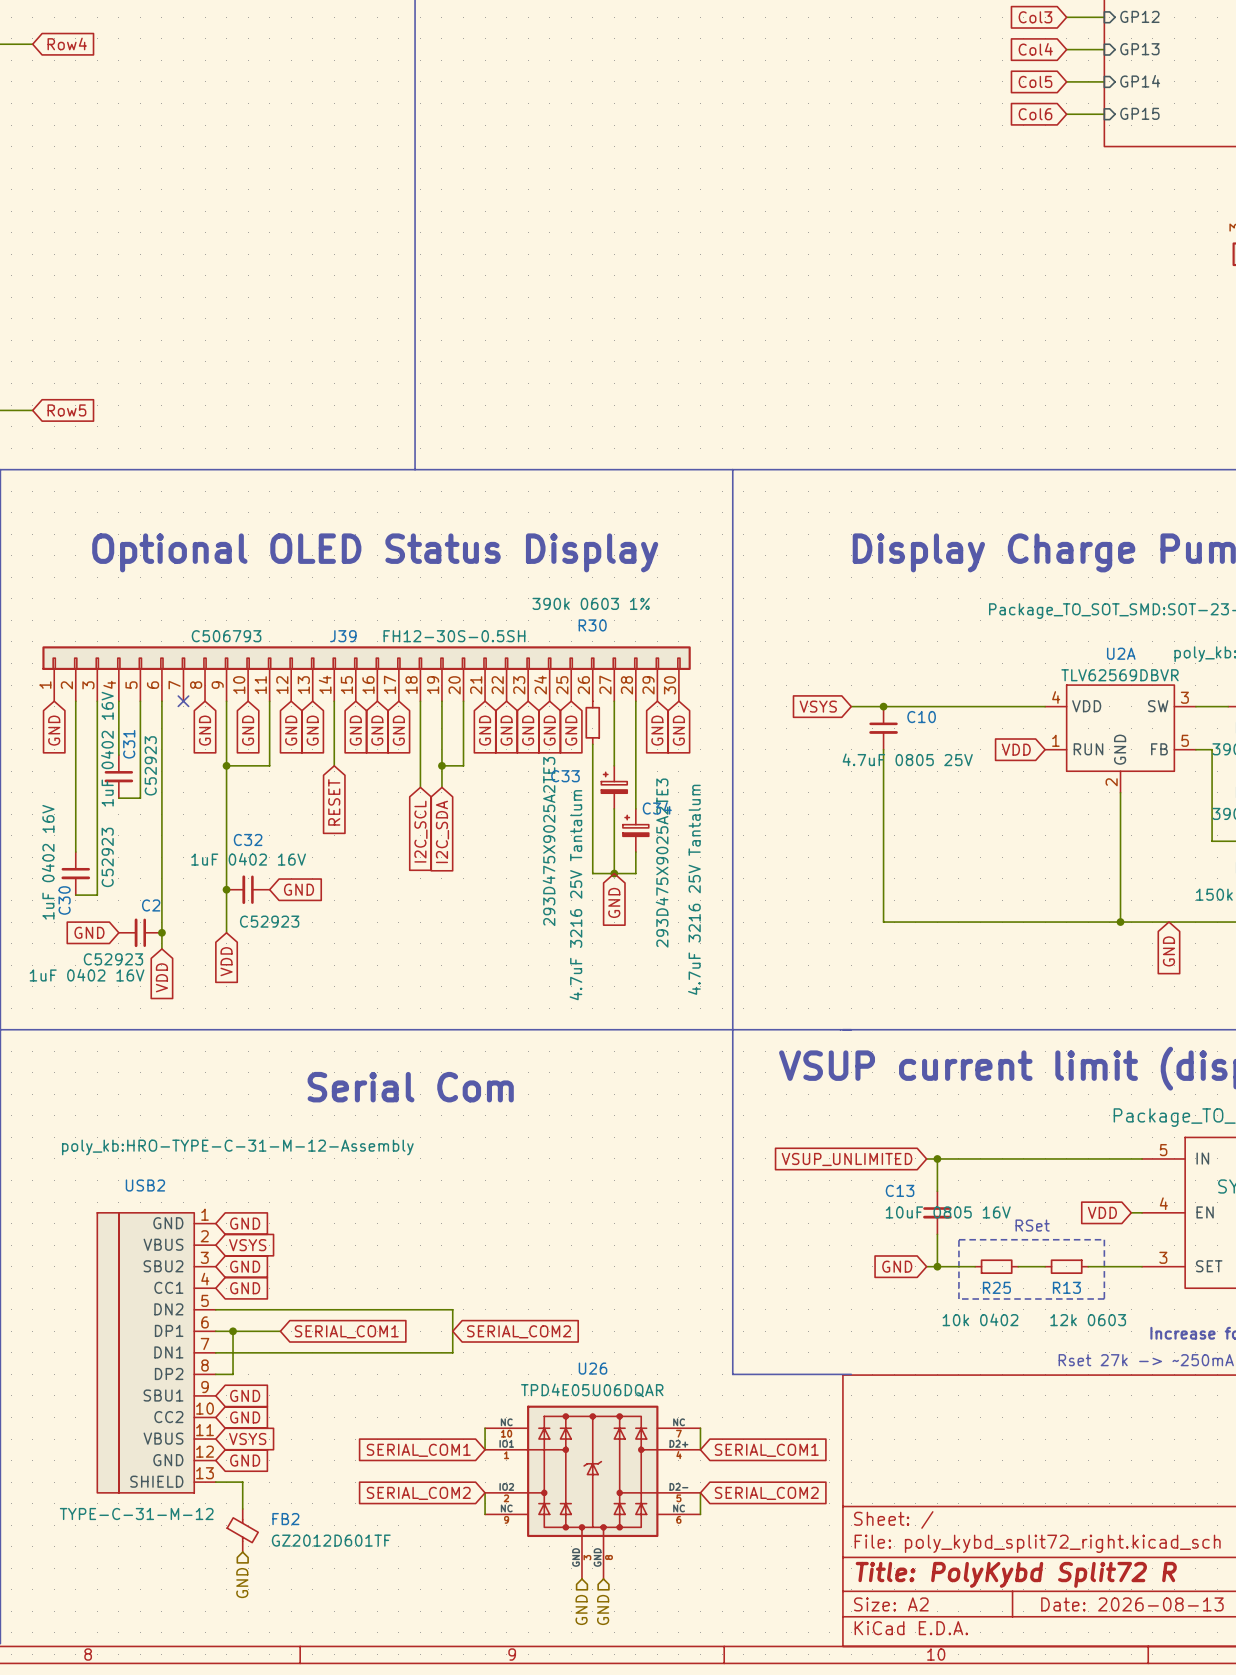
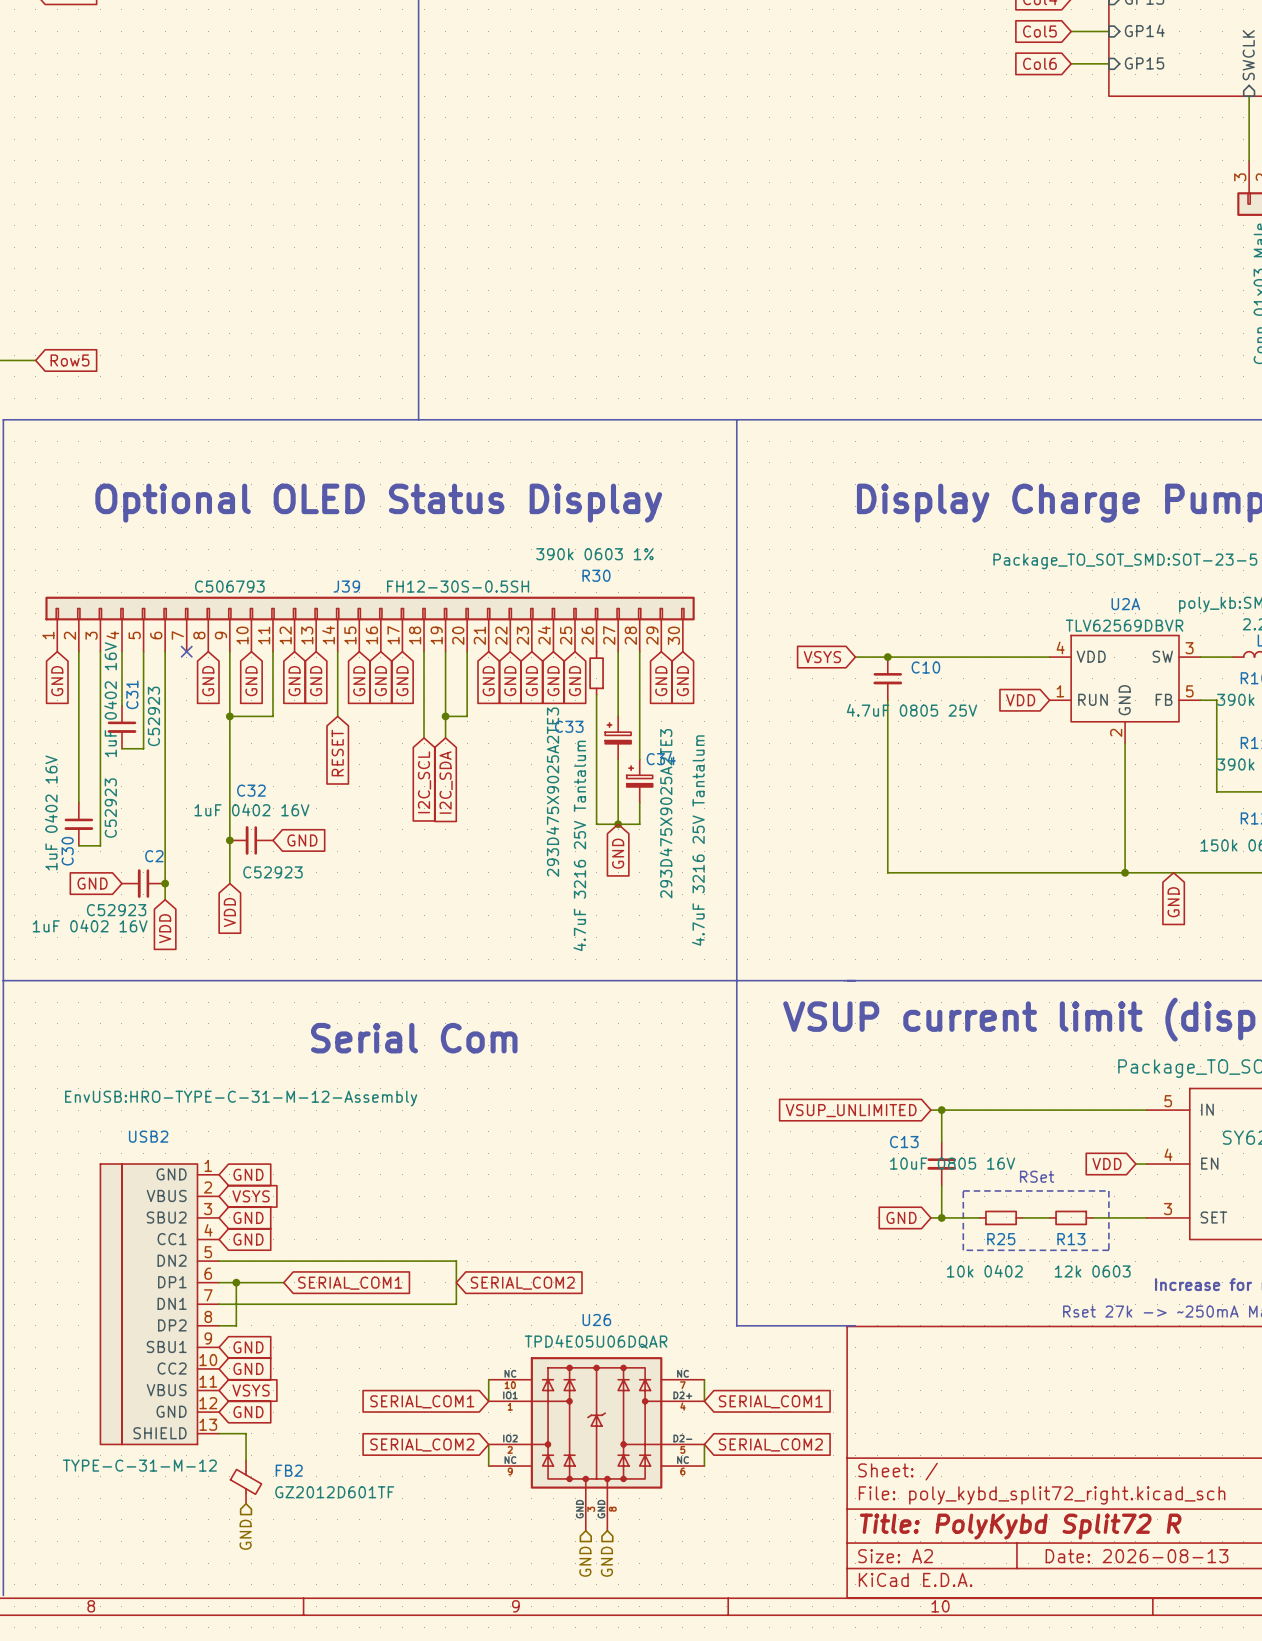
USB2 text: poly_kb:HRO-TYPE-C-31-M-12-Assembly (237, 1147) -> EnvUSB:HRO-TYPE-C-31-M-12-Assembly (241, 1098)

